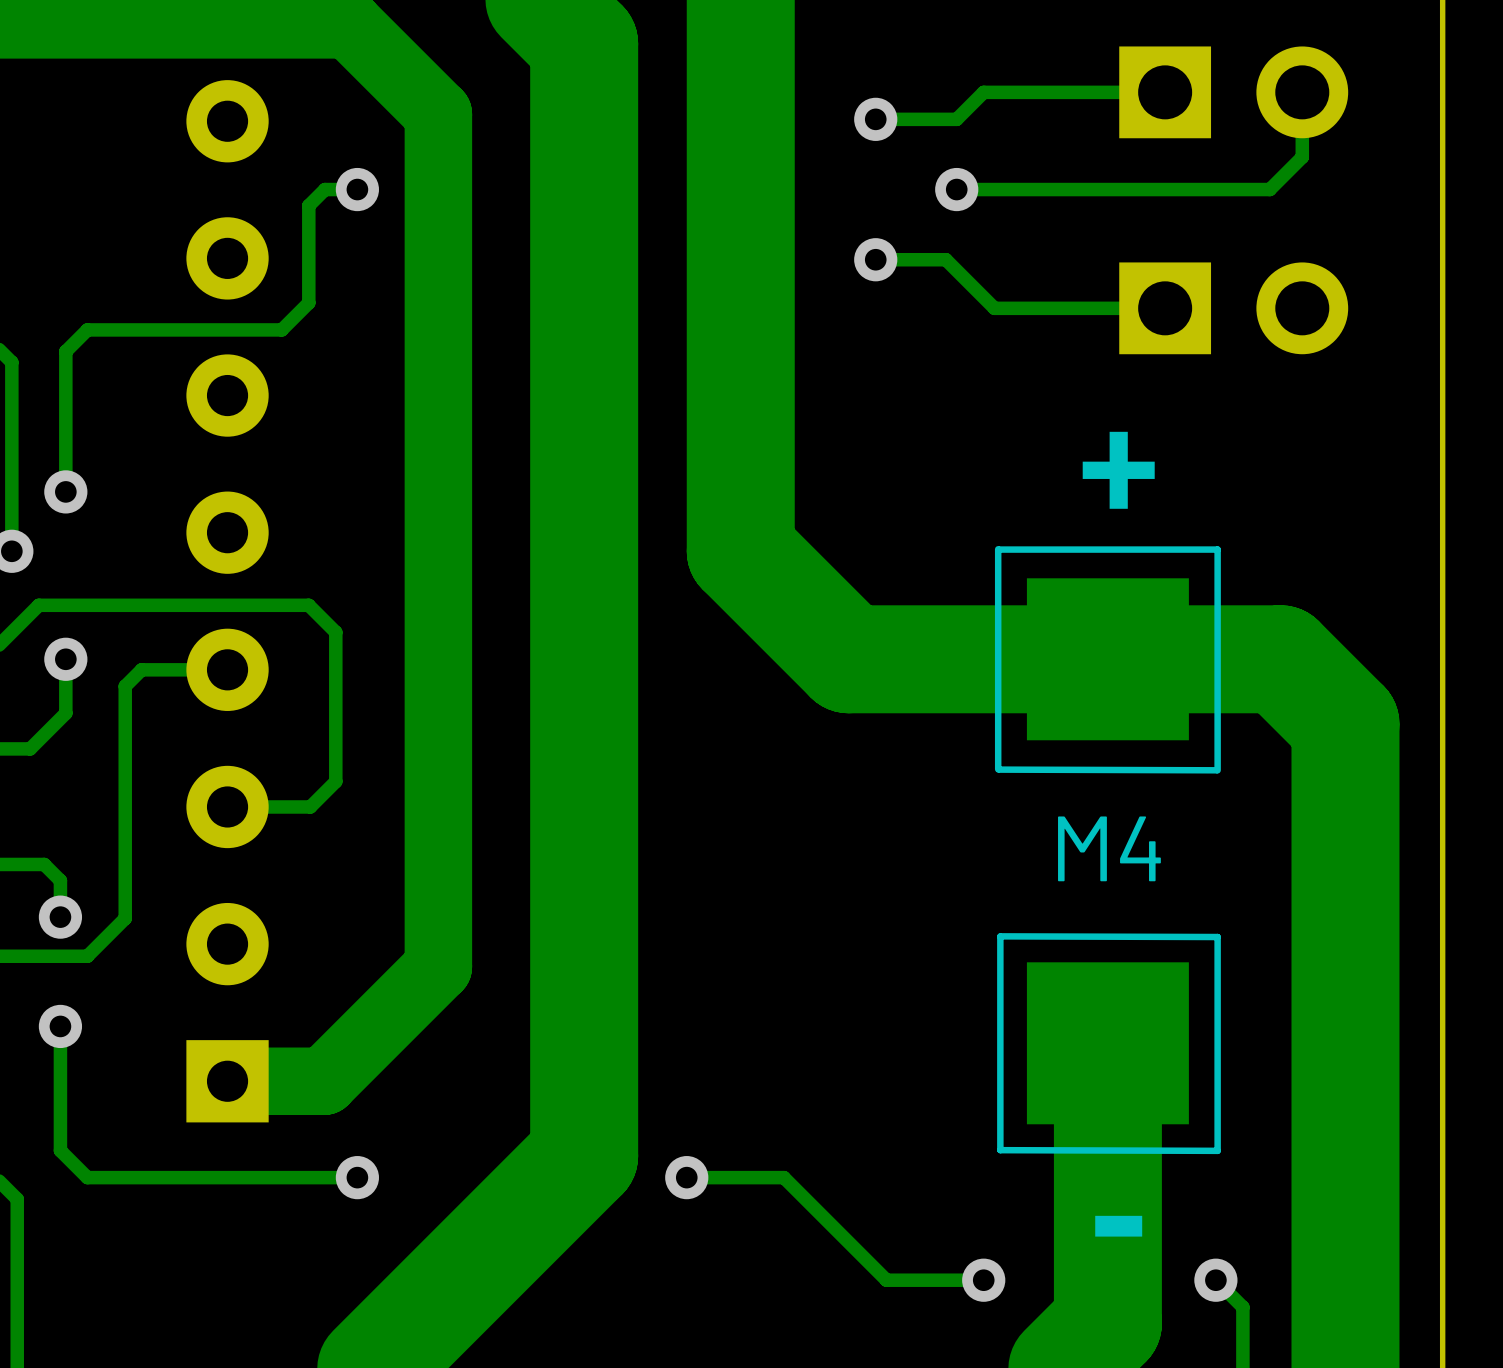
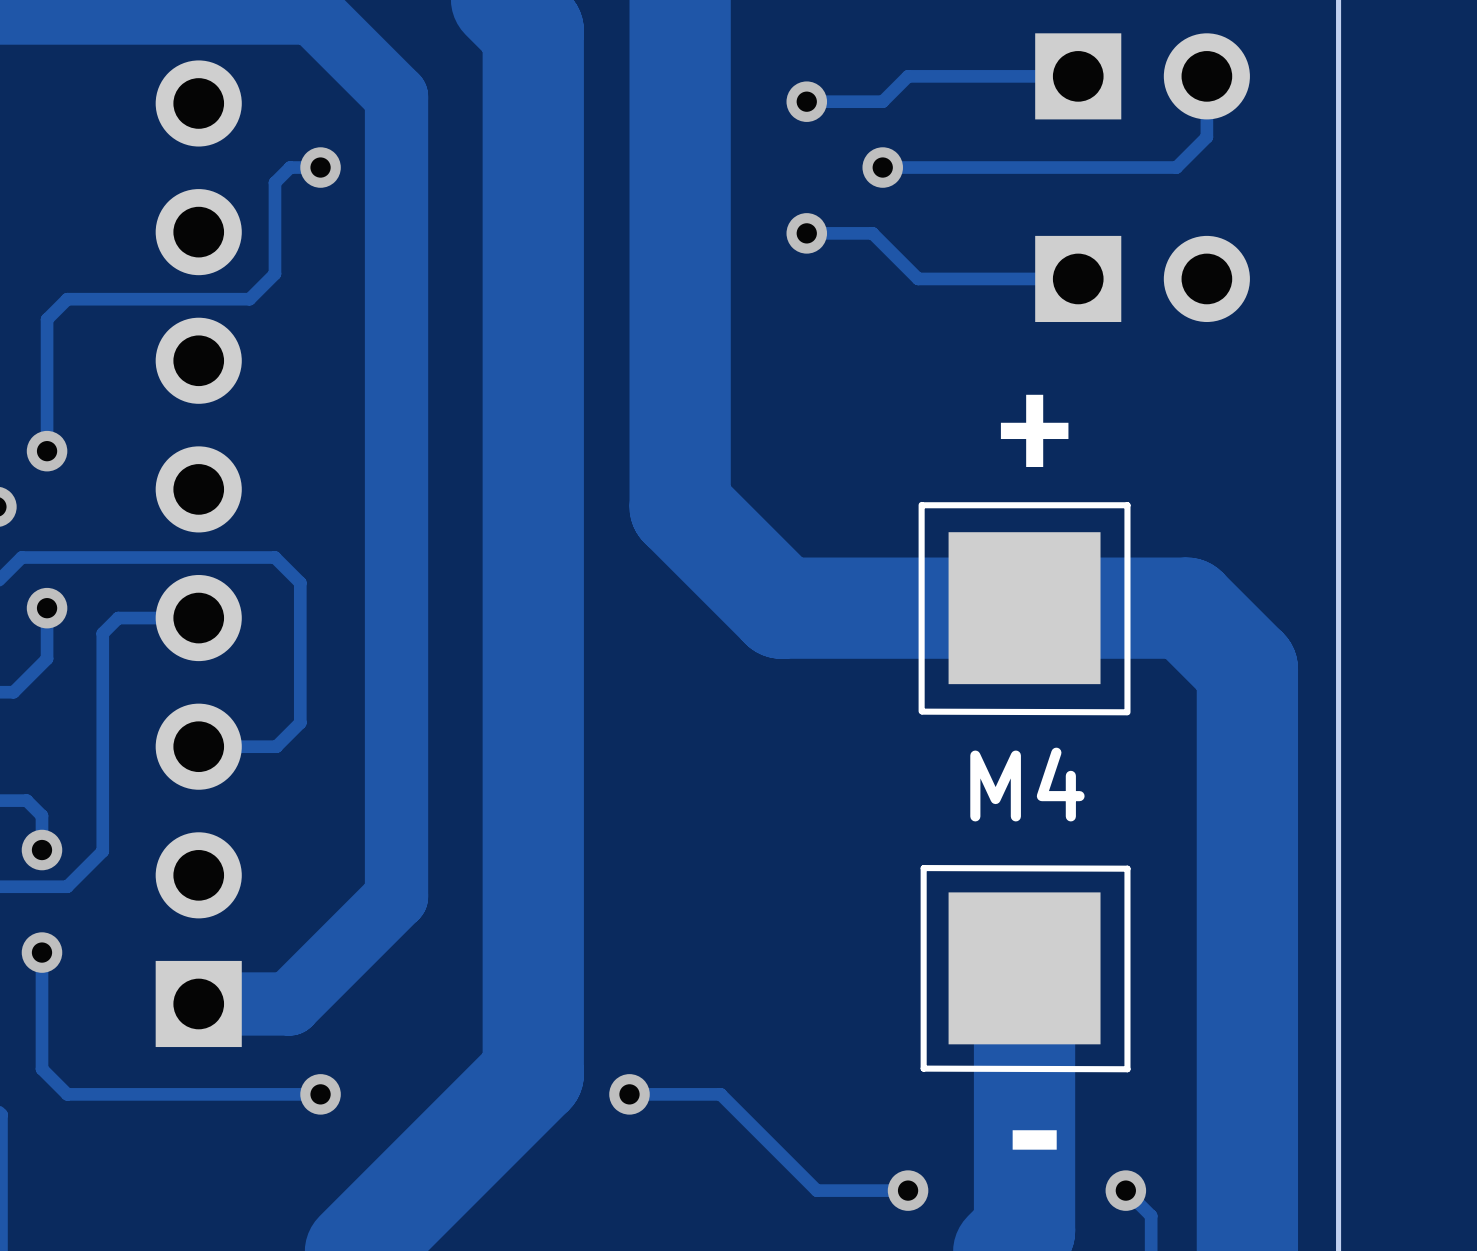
part footprint: [186, 80, 269, 1123] -> [155, 60, 242, 1048]

